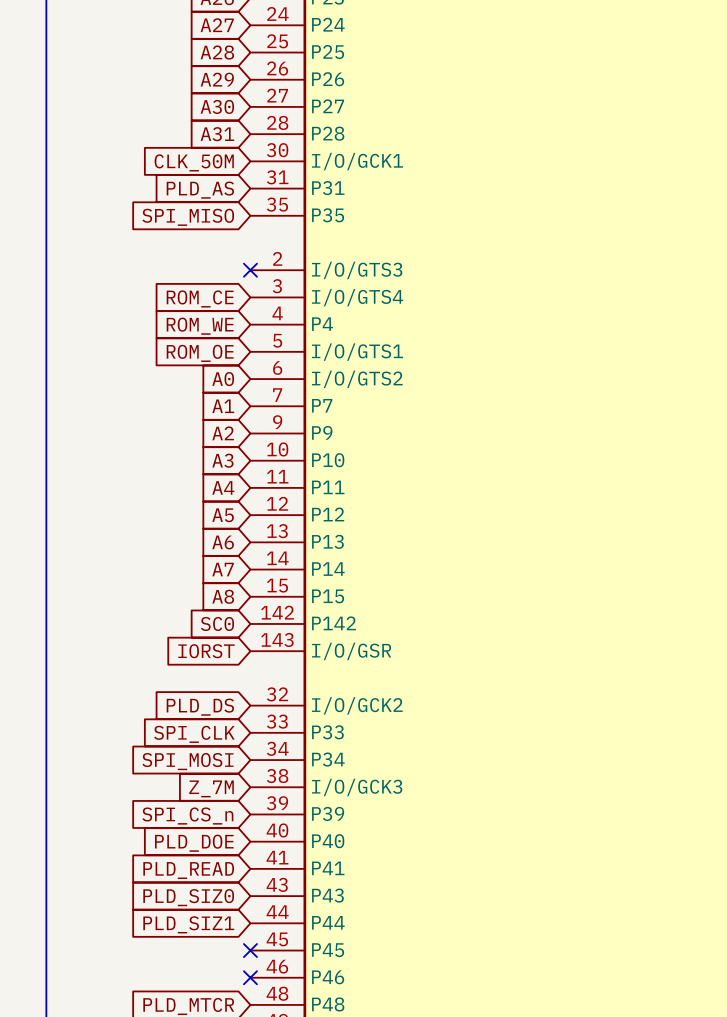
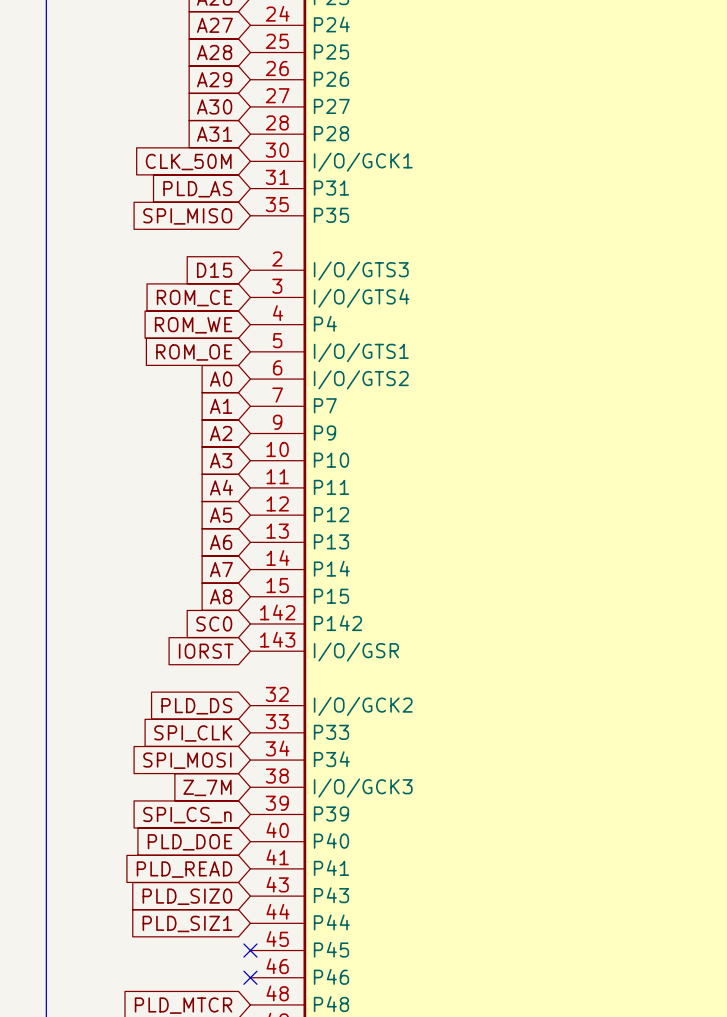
global label: none -> D15 (214, 270)
no-connect mark: (250, 270) -> none

